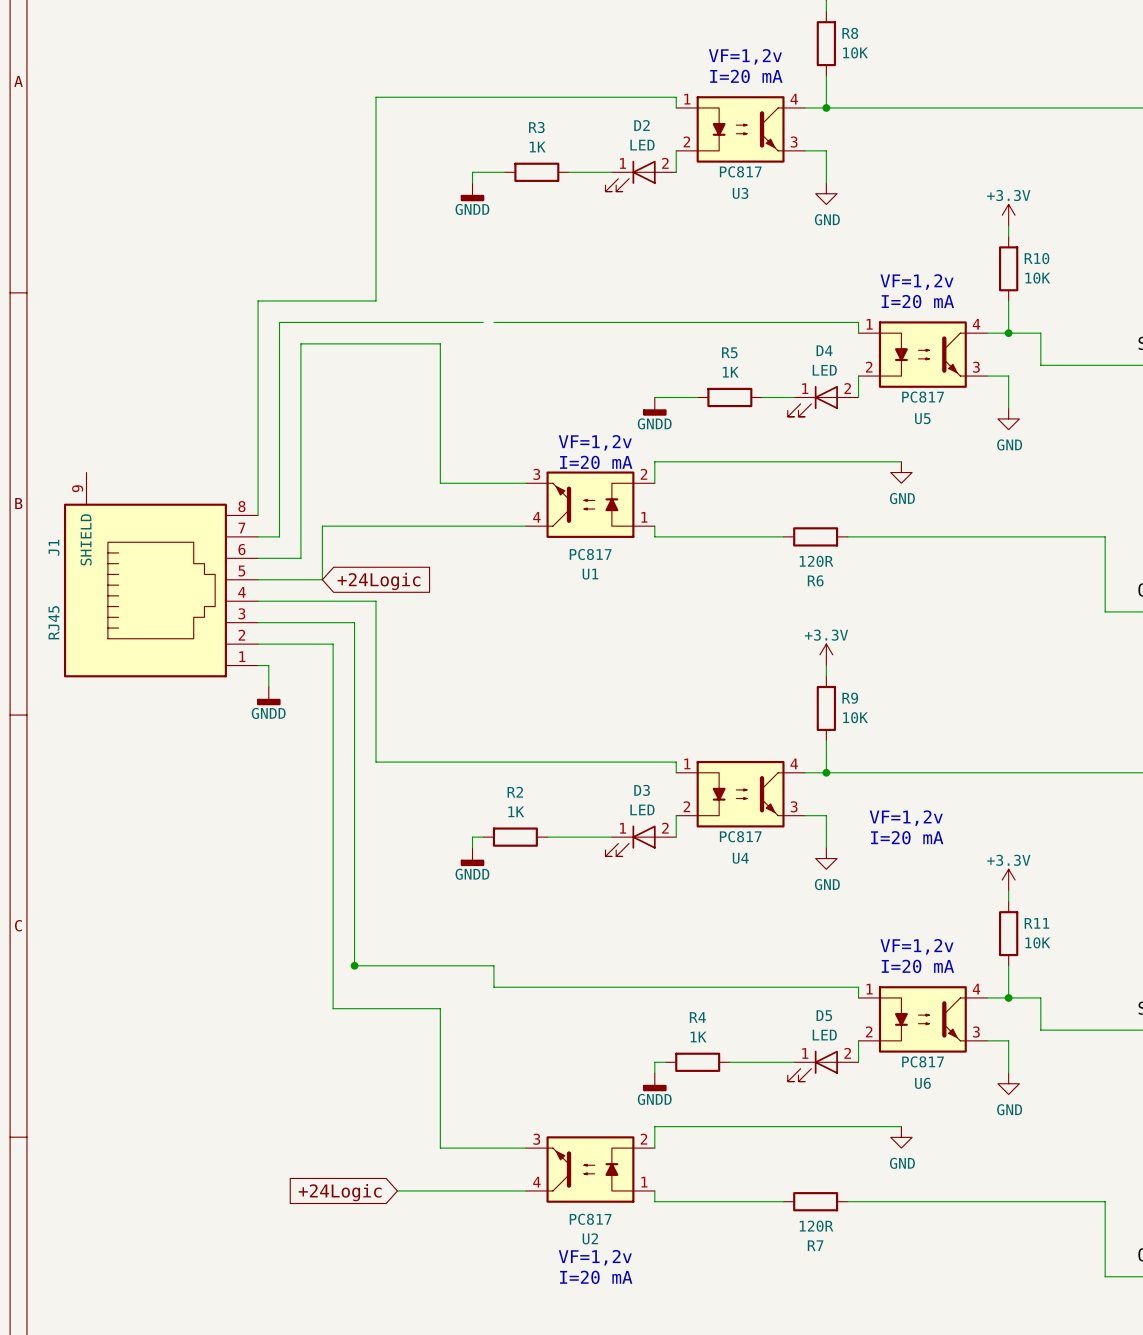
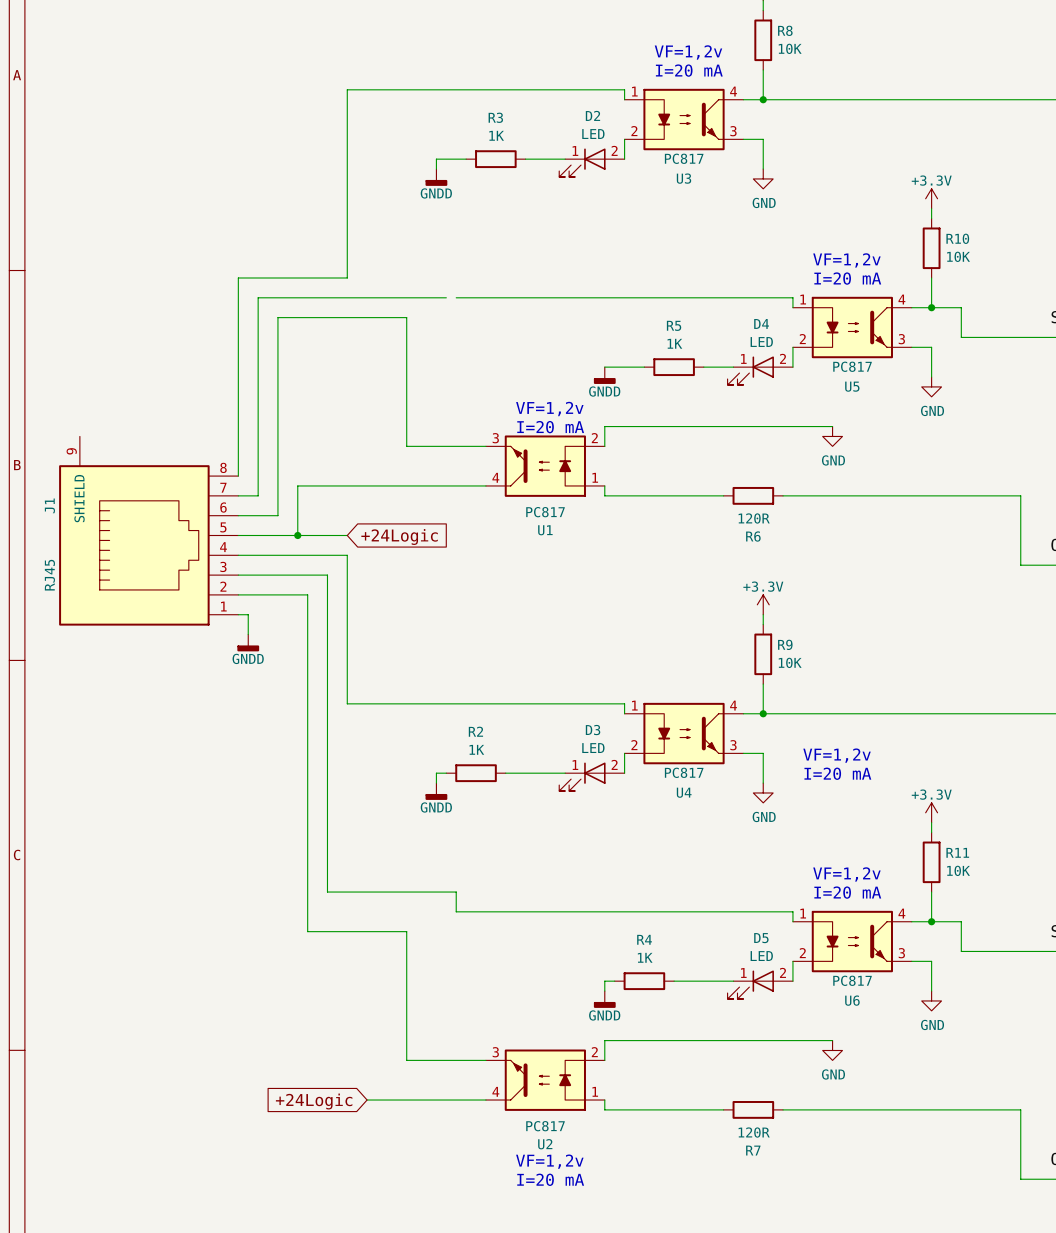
wire: none -> (297, 535) (347, 535)
junction: none -> (297, 535)
global label position: +24Logic (379, 581) -> +24Logic (399, 536)
junction: (354, 965) -> none

